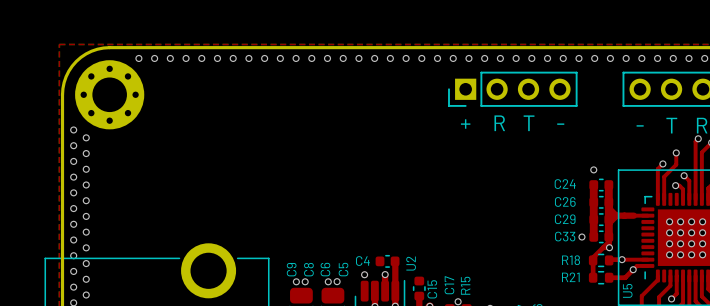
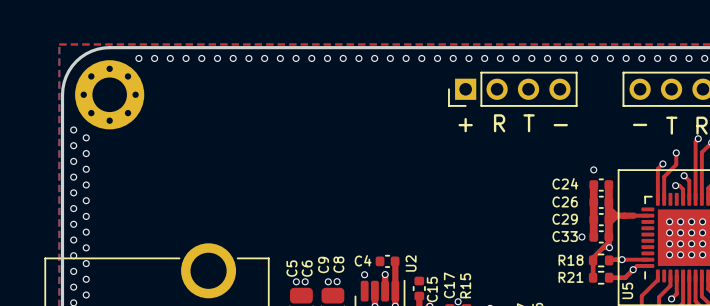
C9 name: C9 (291, 269) -> C8 (338, 264)
C8 name: C8 (308, 269) -> C9 (323, 264)
C6 name position: C6 (325, 269) -> C6 (307, 268)
C5 name position: C5 (343, 269) -> C5 (291, 268)

